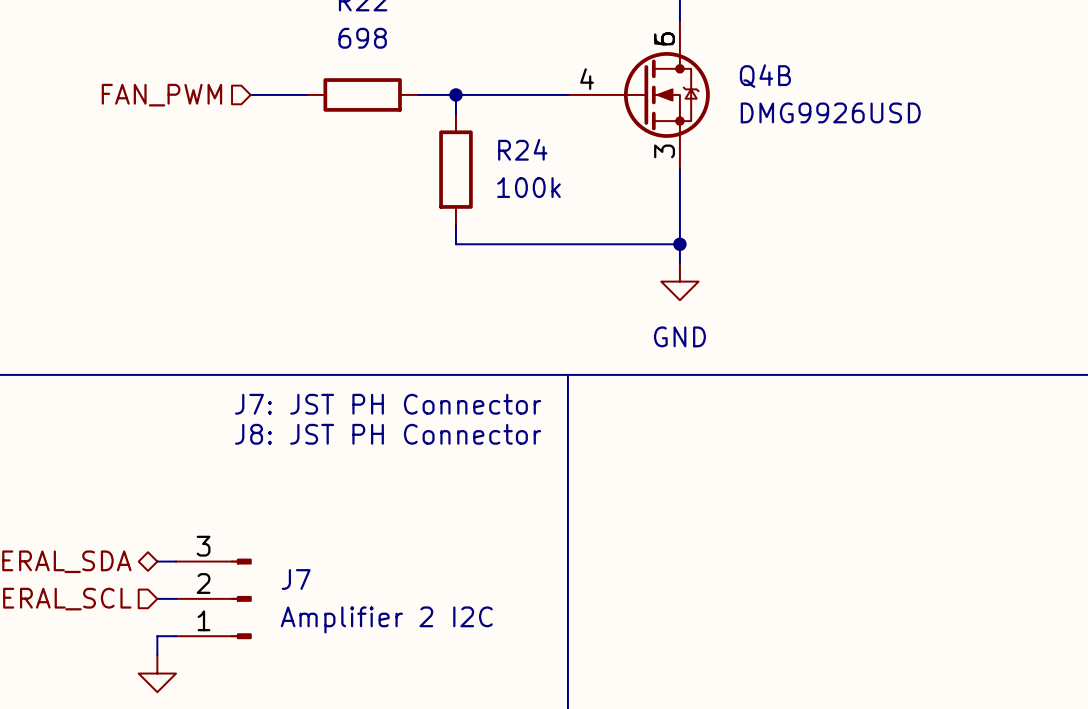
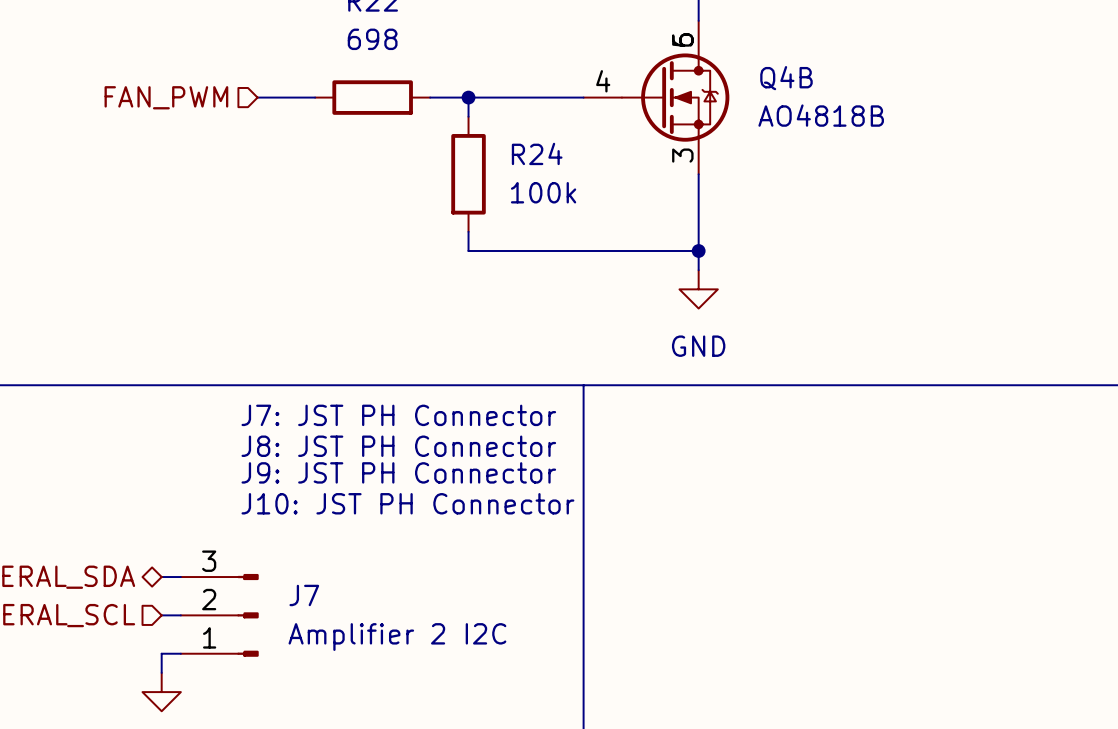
Q4B value: DMG9926USD (830, 112) -> AO4818B (821, 115)
text: none -> J9: JST PH Connector (398, 472)
text: none -> J10: JST PH Connector (407, 503)

